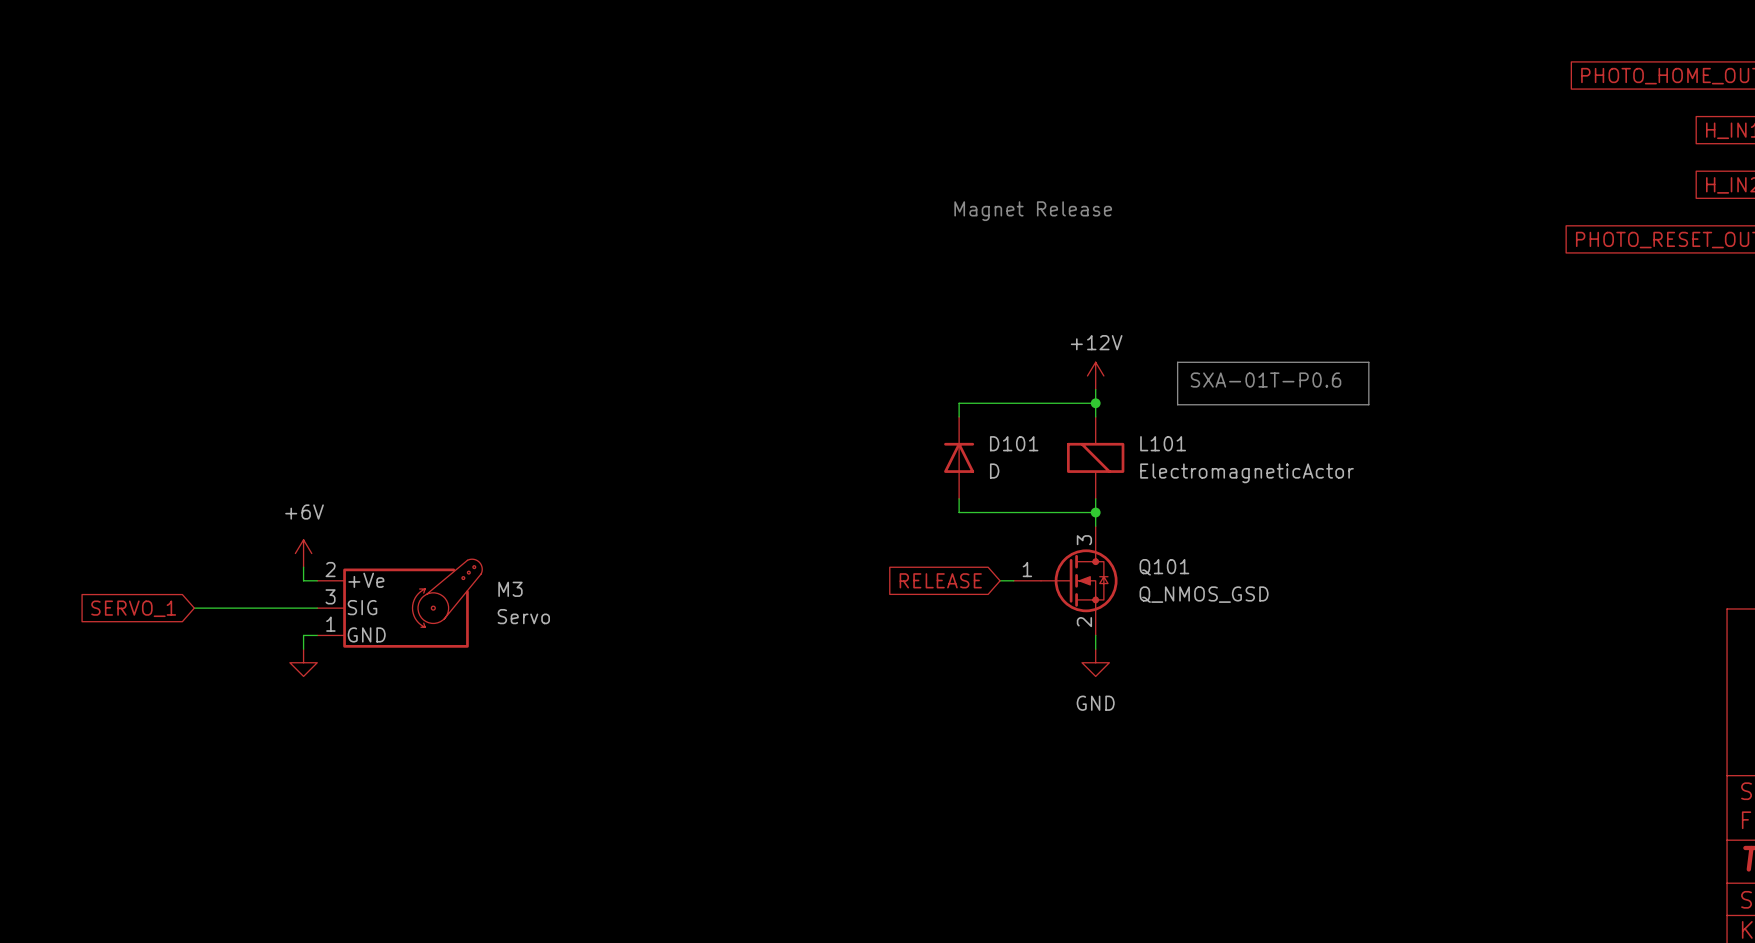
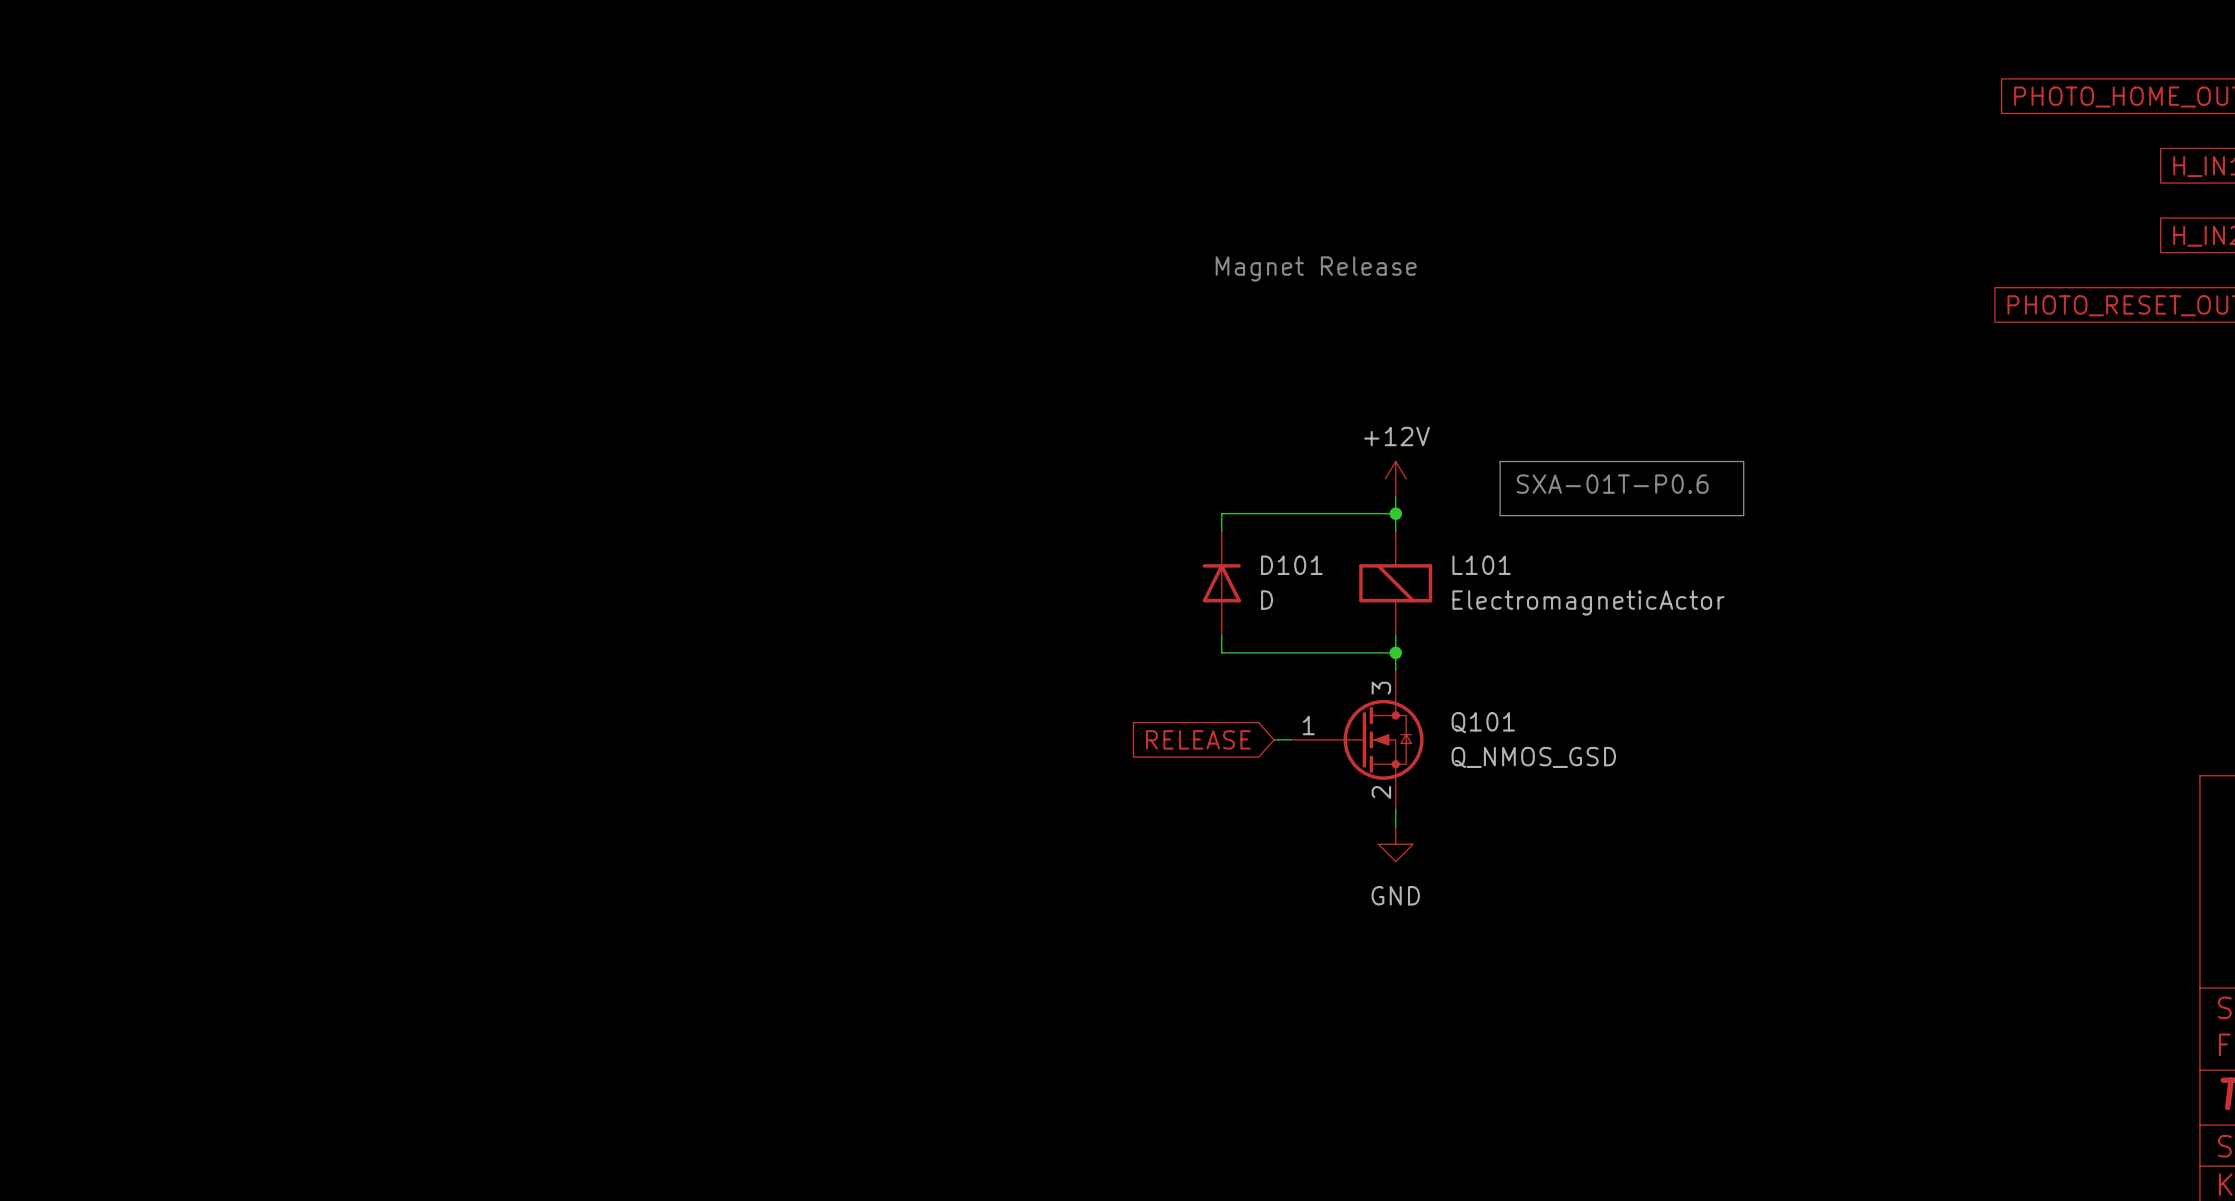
power symbol: +6V (303, 553) -> none
wire: (303, 567) (303, 580) (317, 580) -> none
M3: Servo (399, 603) -> none
global label: SERVO_1 (133, 608) -> none
wire: (194, 608) (317, 608) -> none
wire: (317, 635) (303, 635) (303, 649) -> none
power symbol: (303, 662) -> none

